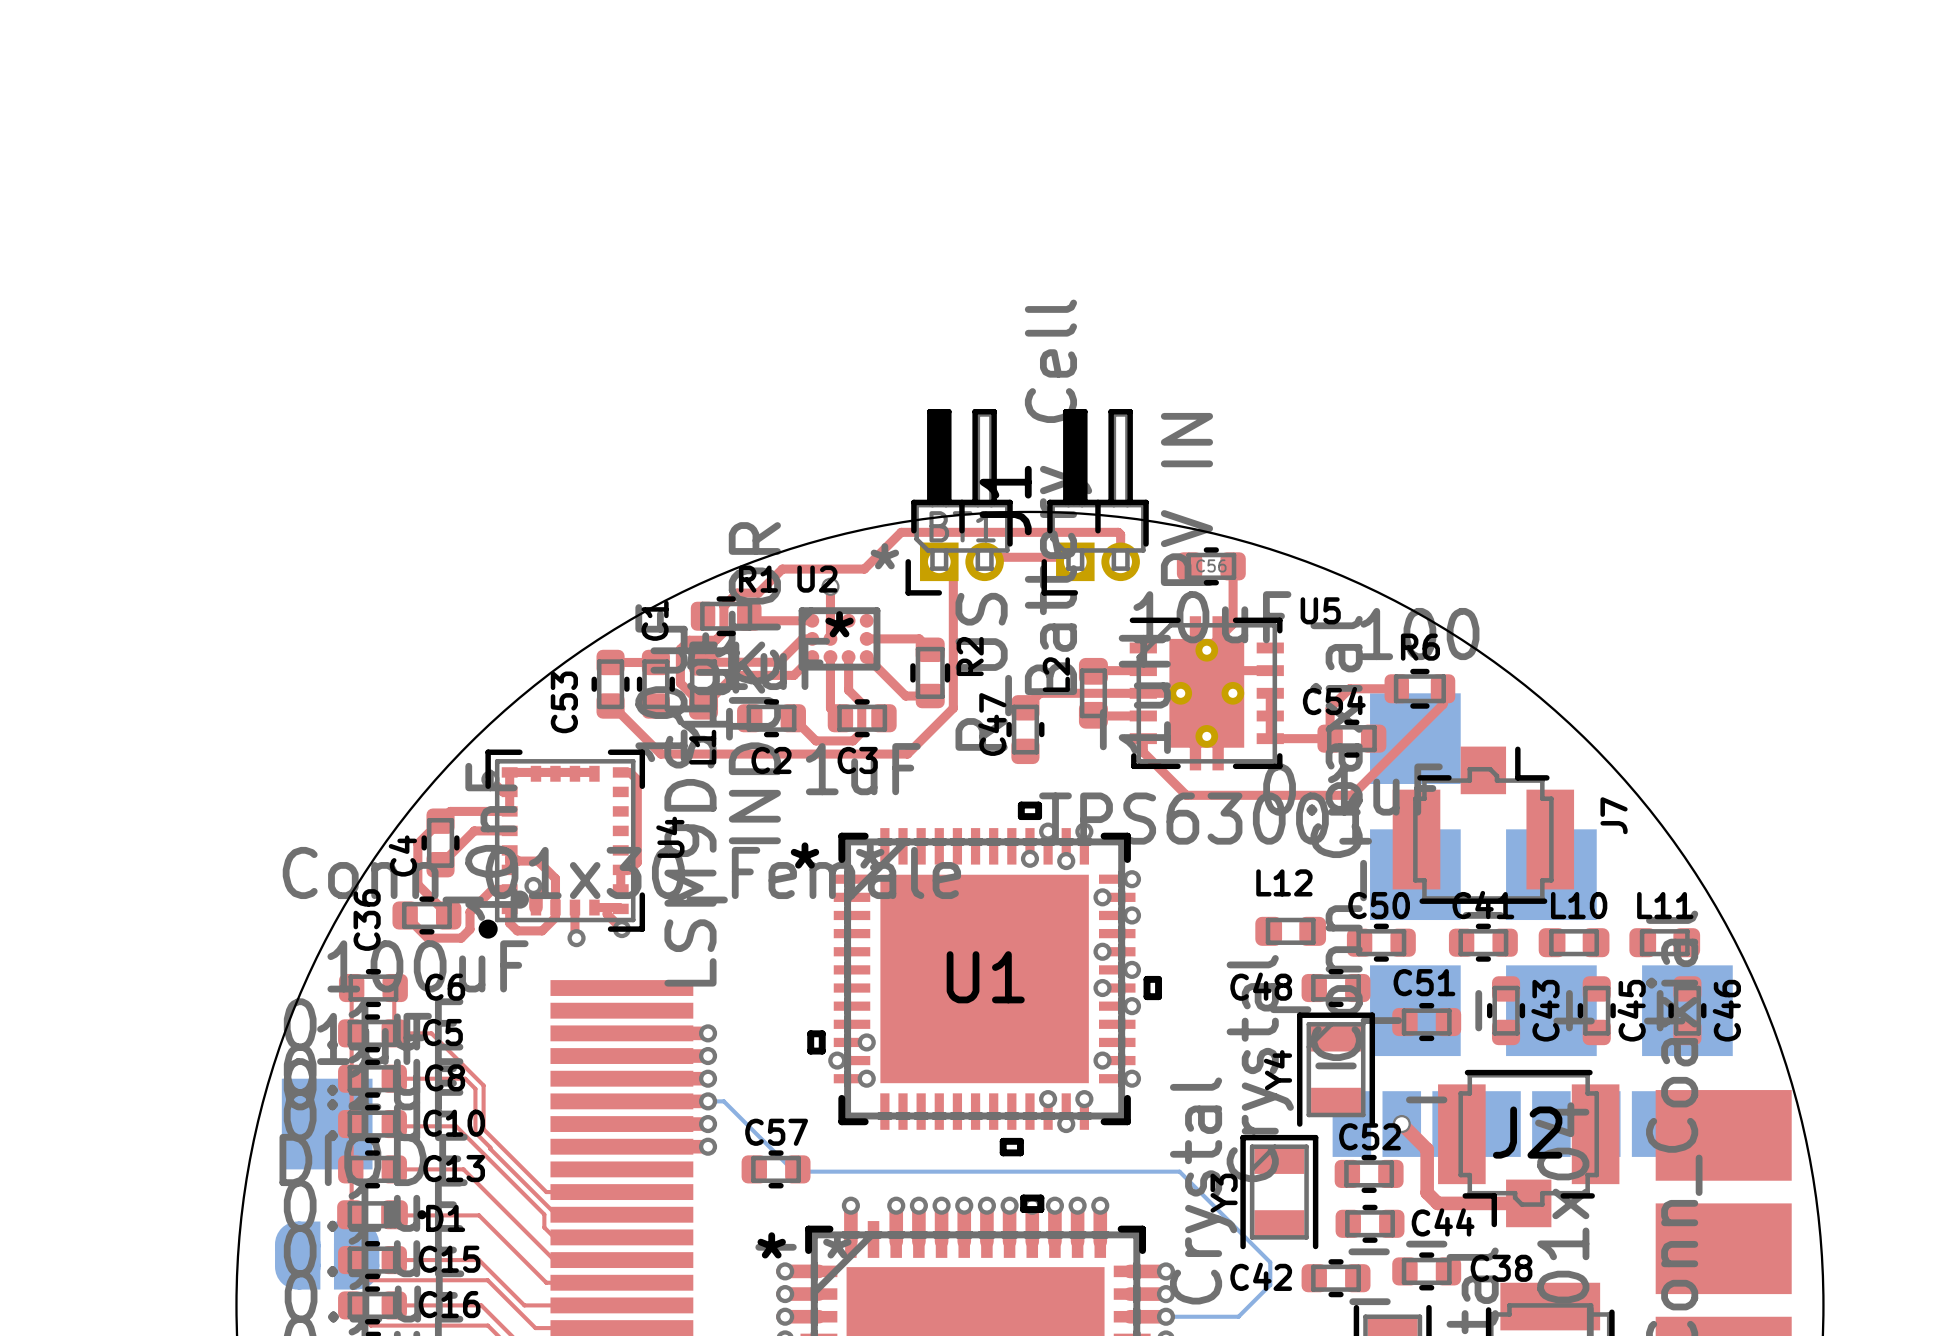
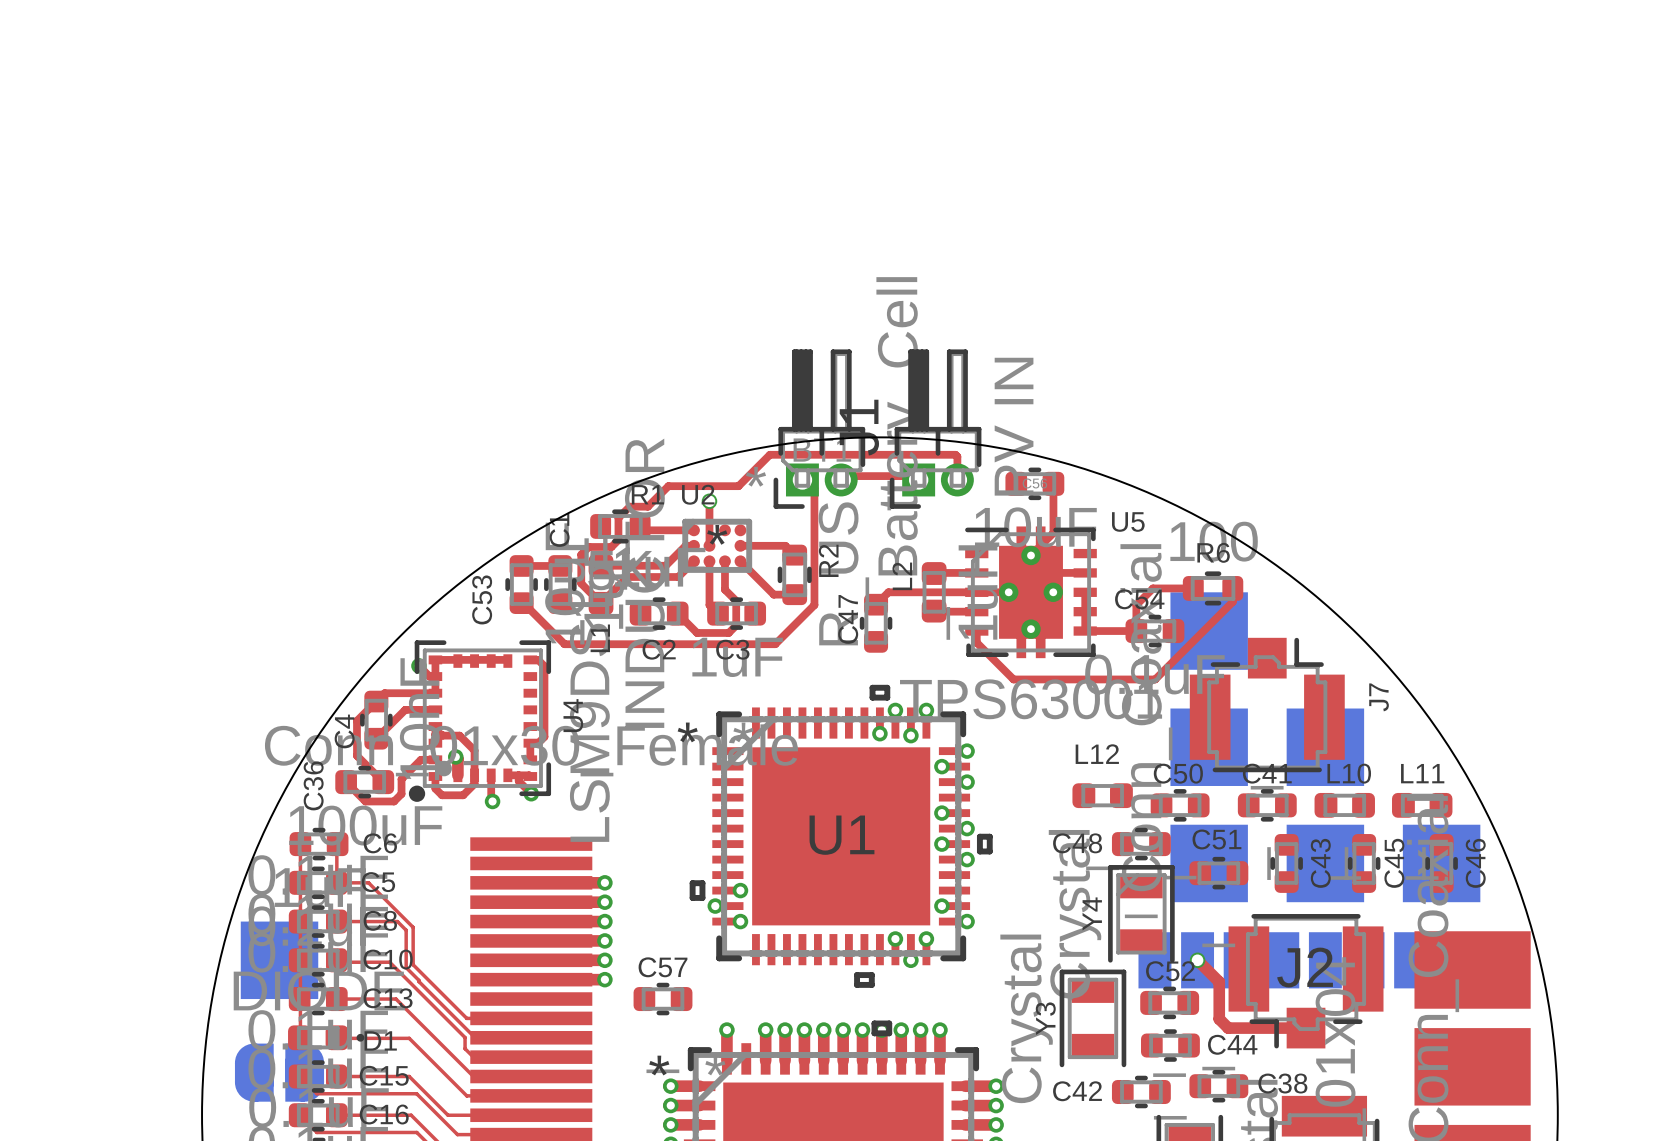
bottom track: (708, 1101) (723, 1101) (794, 1171) (1179, 1171) (1270, 1262) (1270, 1285) (1238, 1316) (1165, 1316) -> none

